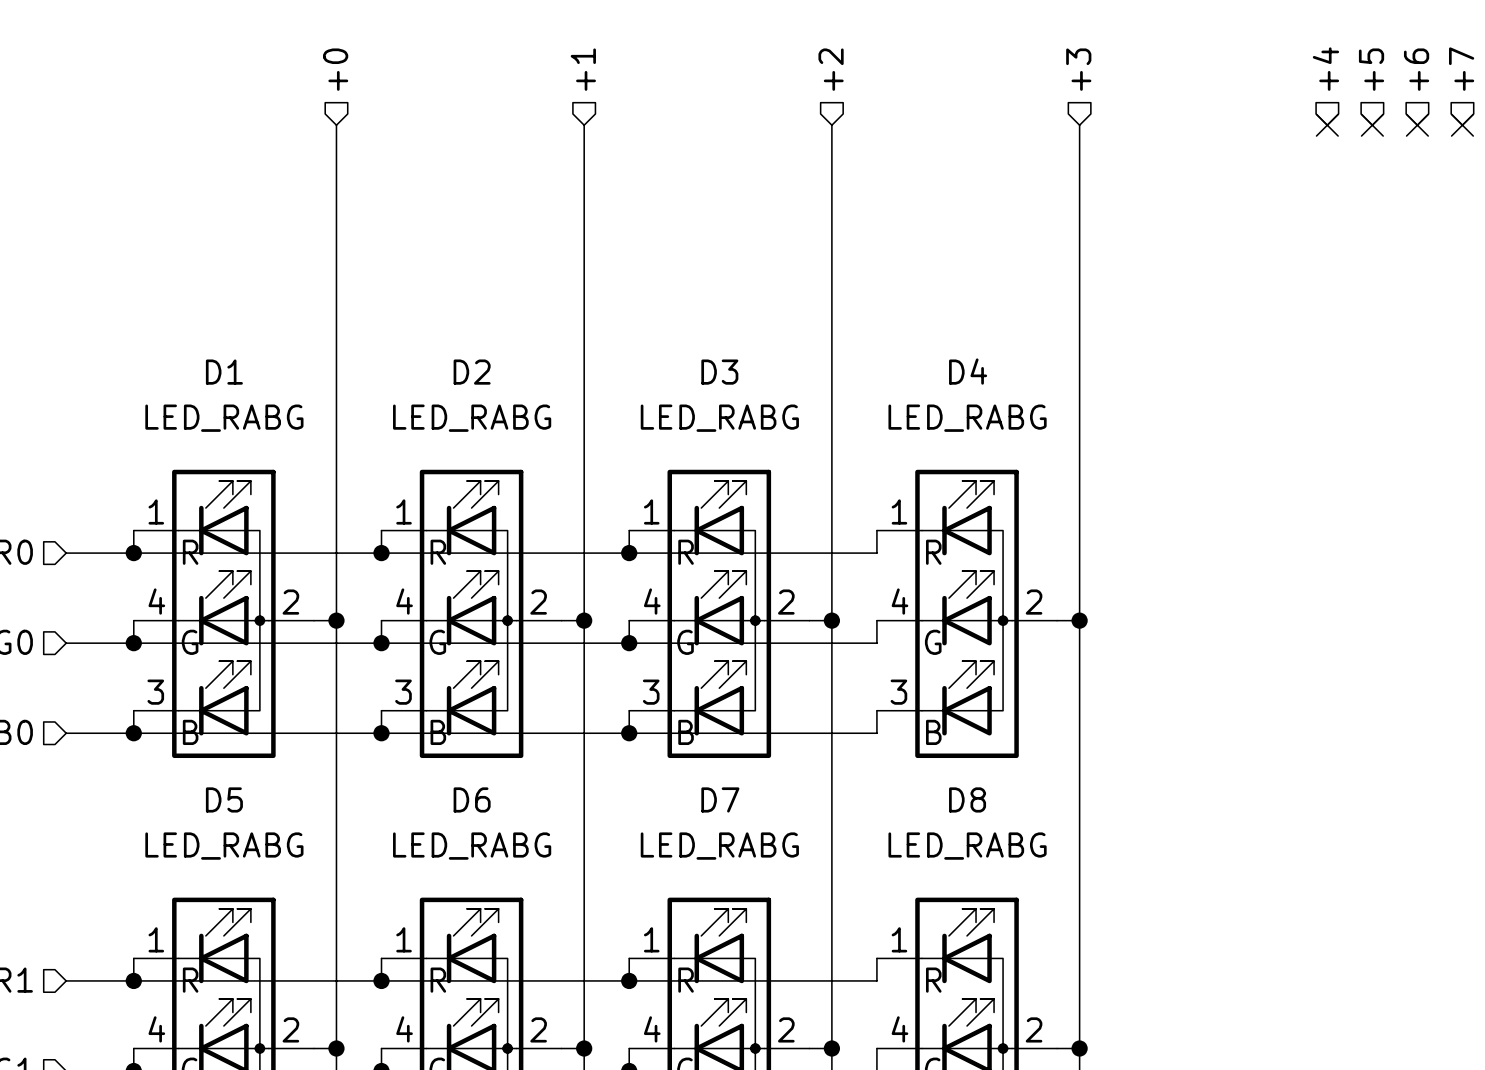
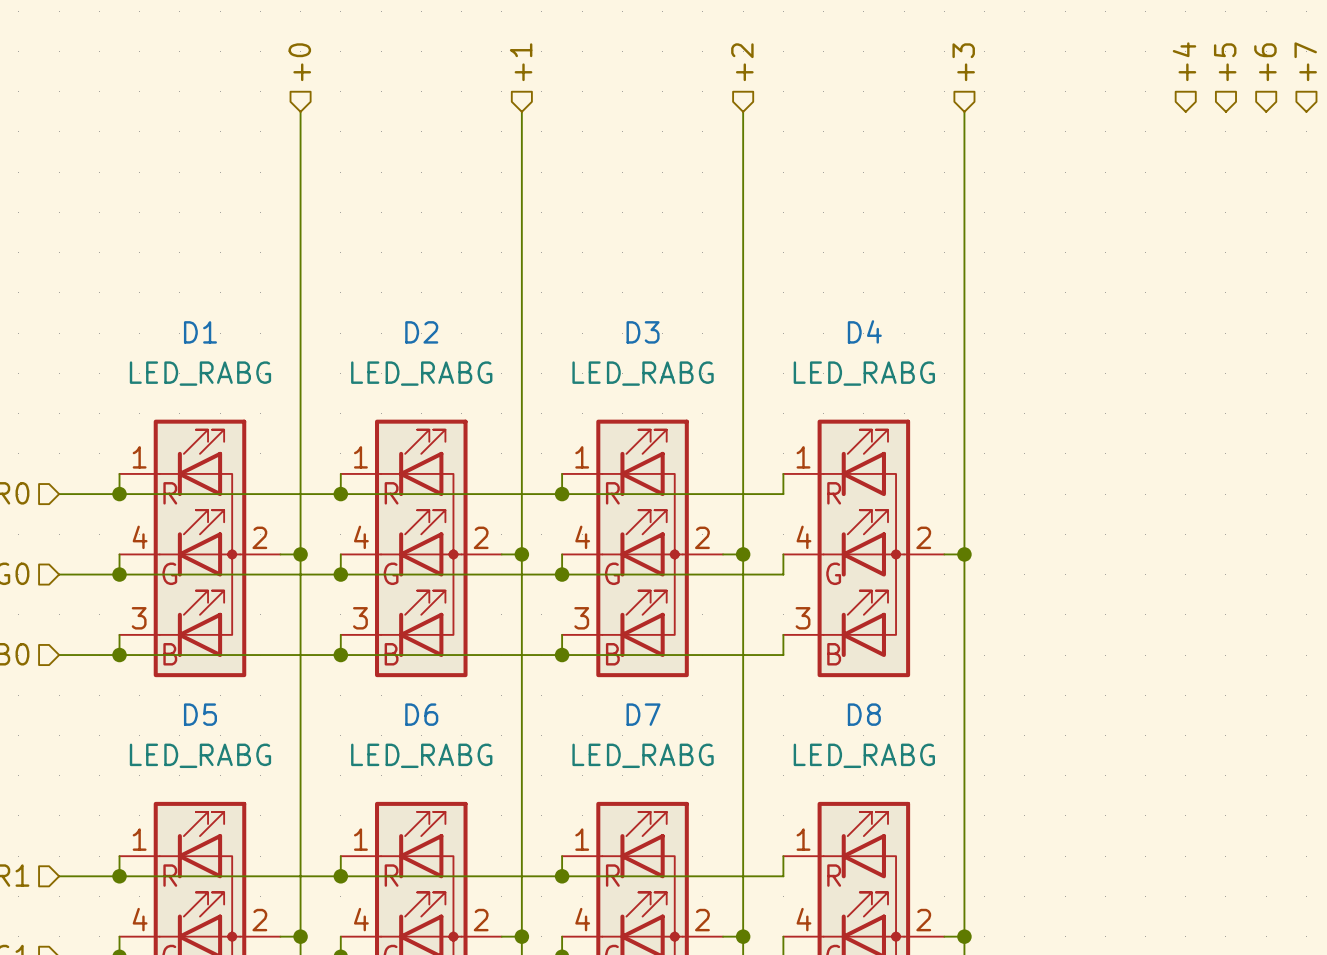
no-connect mark: (1327, 125) -> none
no-connect mark: (1372, 125) -> none
no-connect mark: (1417, 125) -> none
no-connect mark: (1462, 125) -> none

